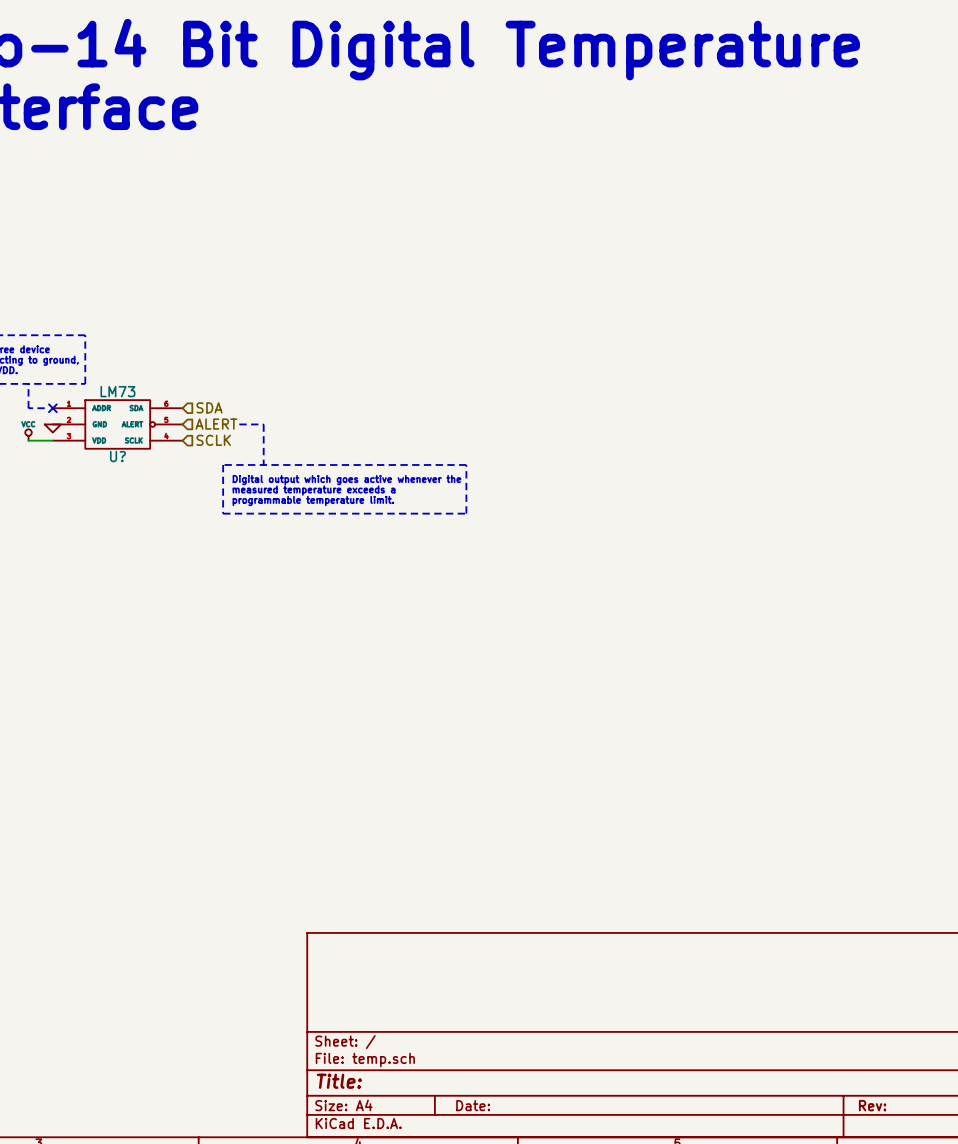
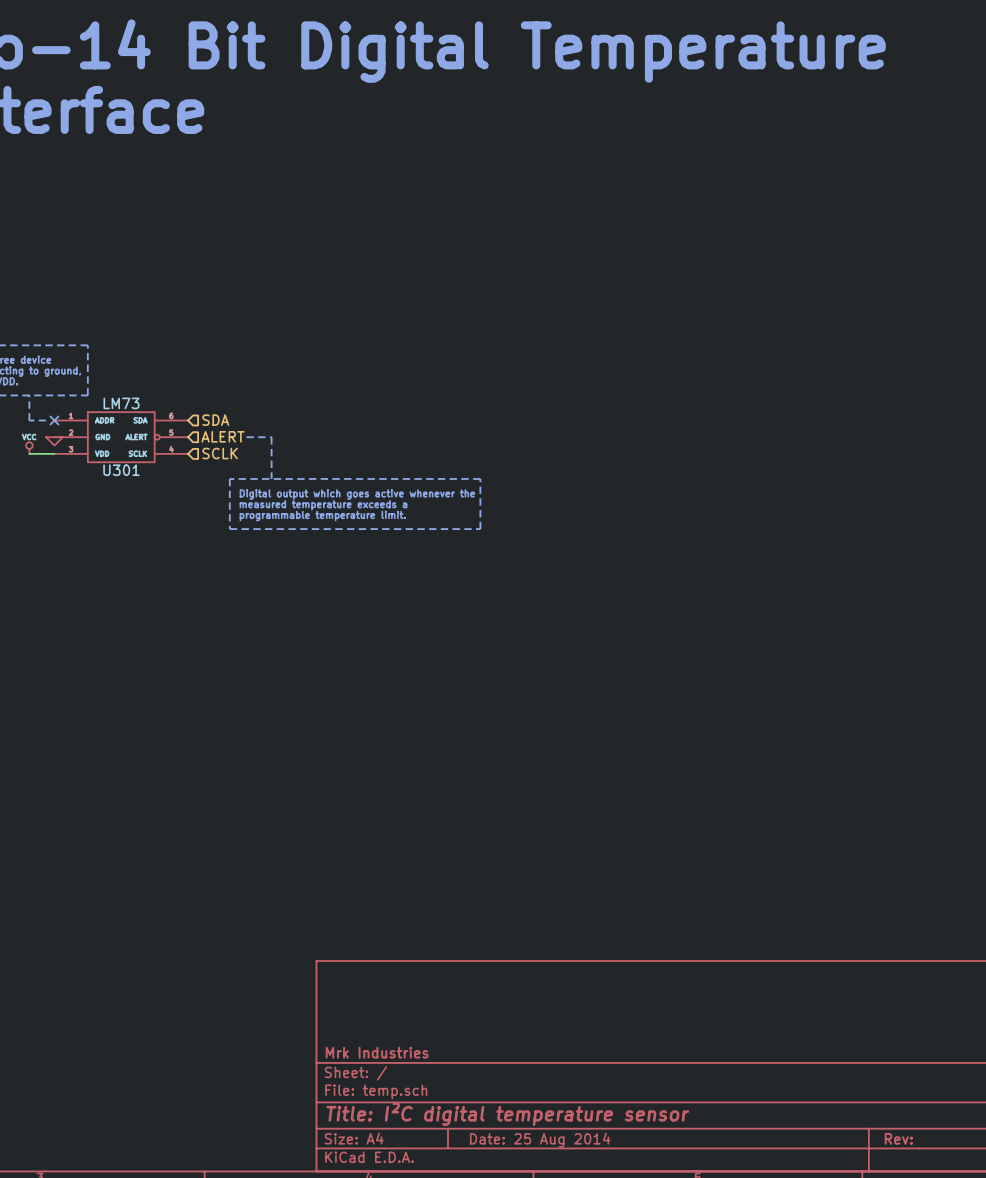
U? name: U? (117, 456) -> U301 (121, 470)
title block: none -> Mrk Industries (377, 1052)
title block: Title: (339, 1081) -> Title: I²C digital temperature sensor (507, 1114)
title block: Date: (473, 1105) -> Date: 25 Aug 2014 (540, 1140)

